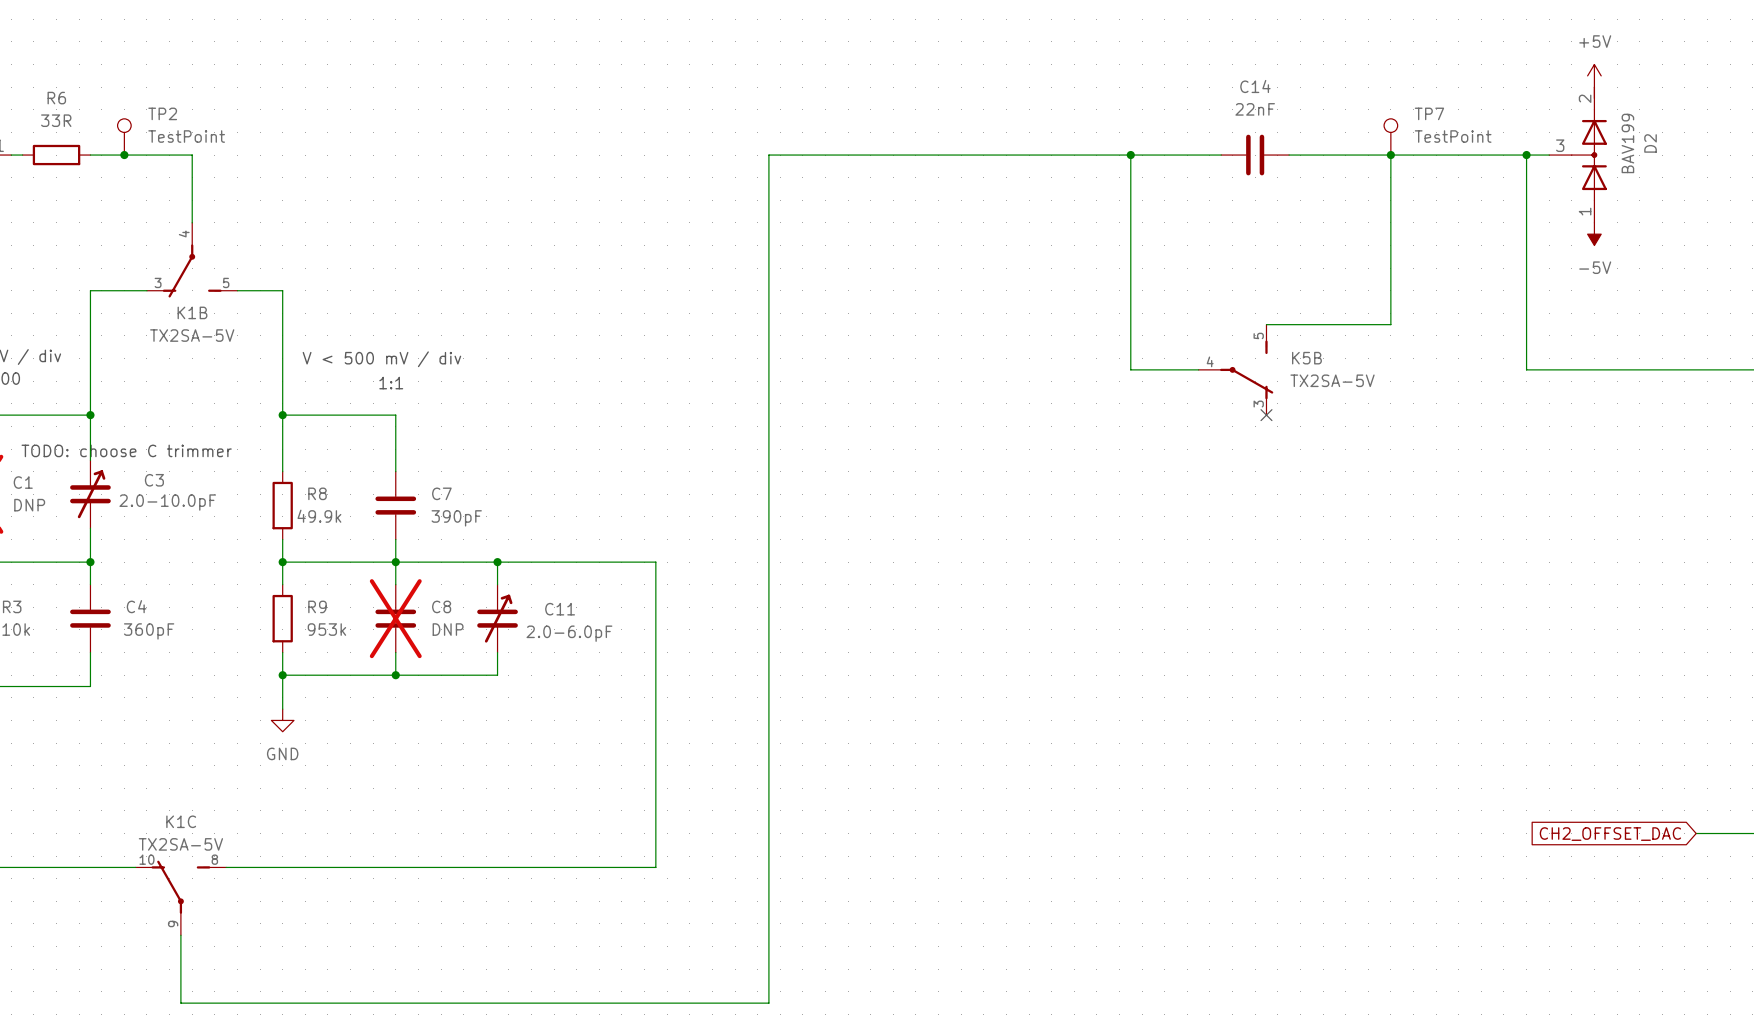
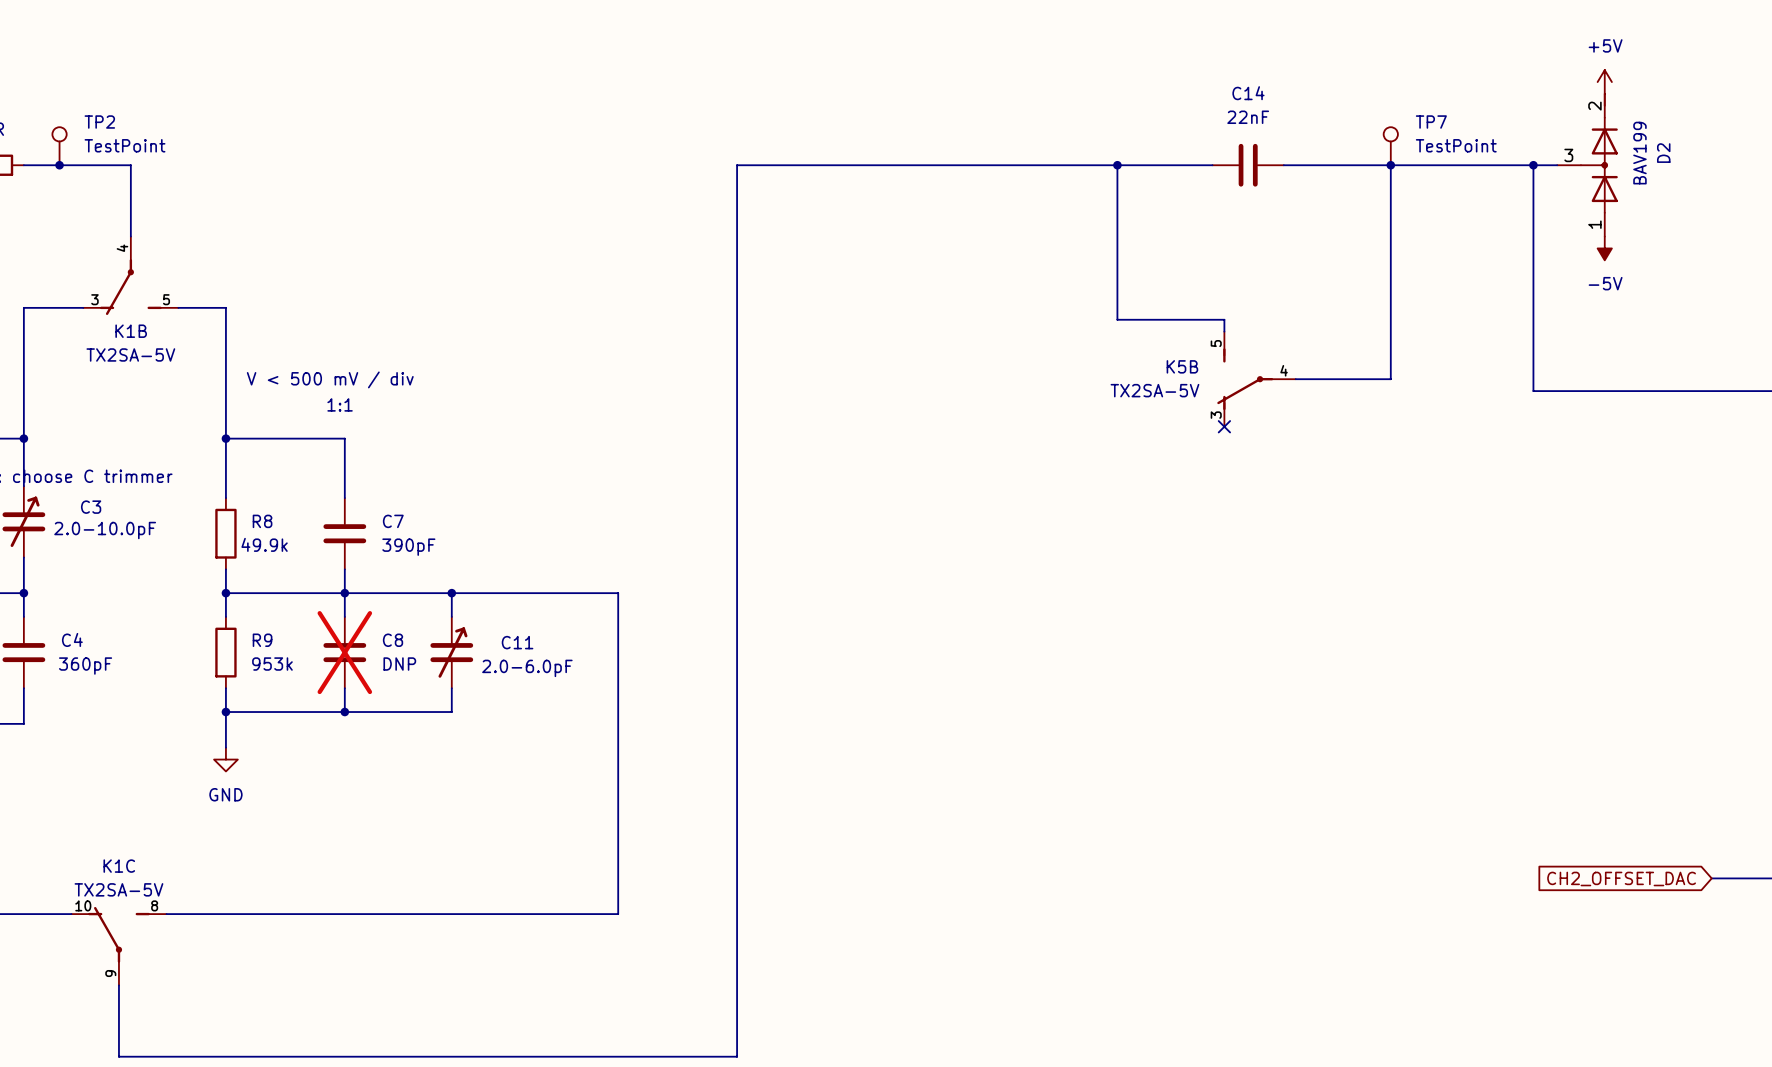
wire: (1130, 302) (1130, 369) (1198, 369) -> (1117, 319) (1224, 319) (1224, 331)
wire: (1266, 324) (1390, 324) -> (1295, 379) (1390, 379) (1390, 343)
K5B flip: as is (1246, 369) -> left-right (1245, 379)
no-connect mark position: (1266, 415) -> (1224, 426)

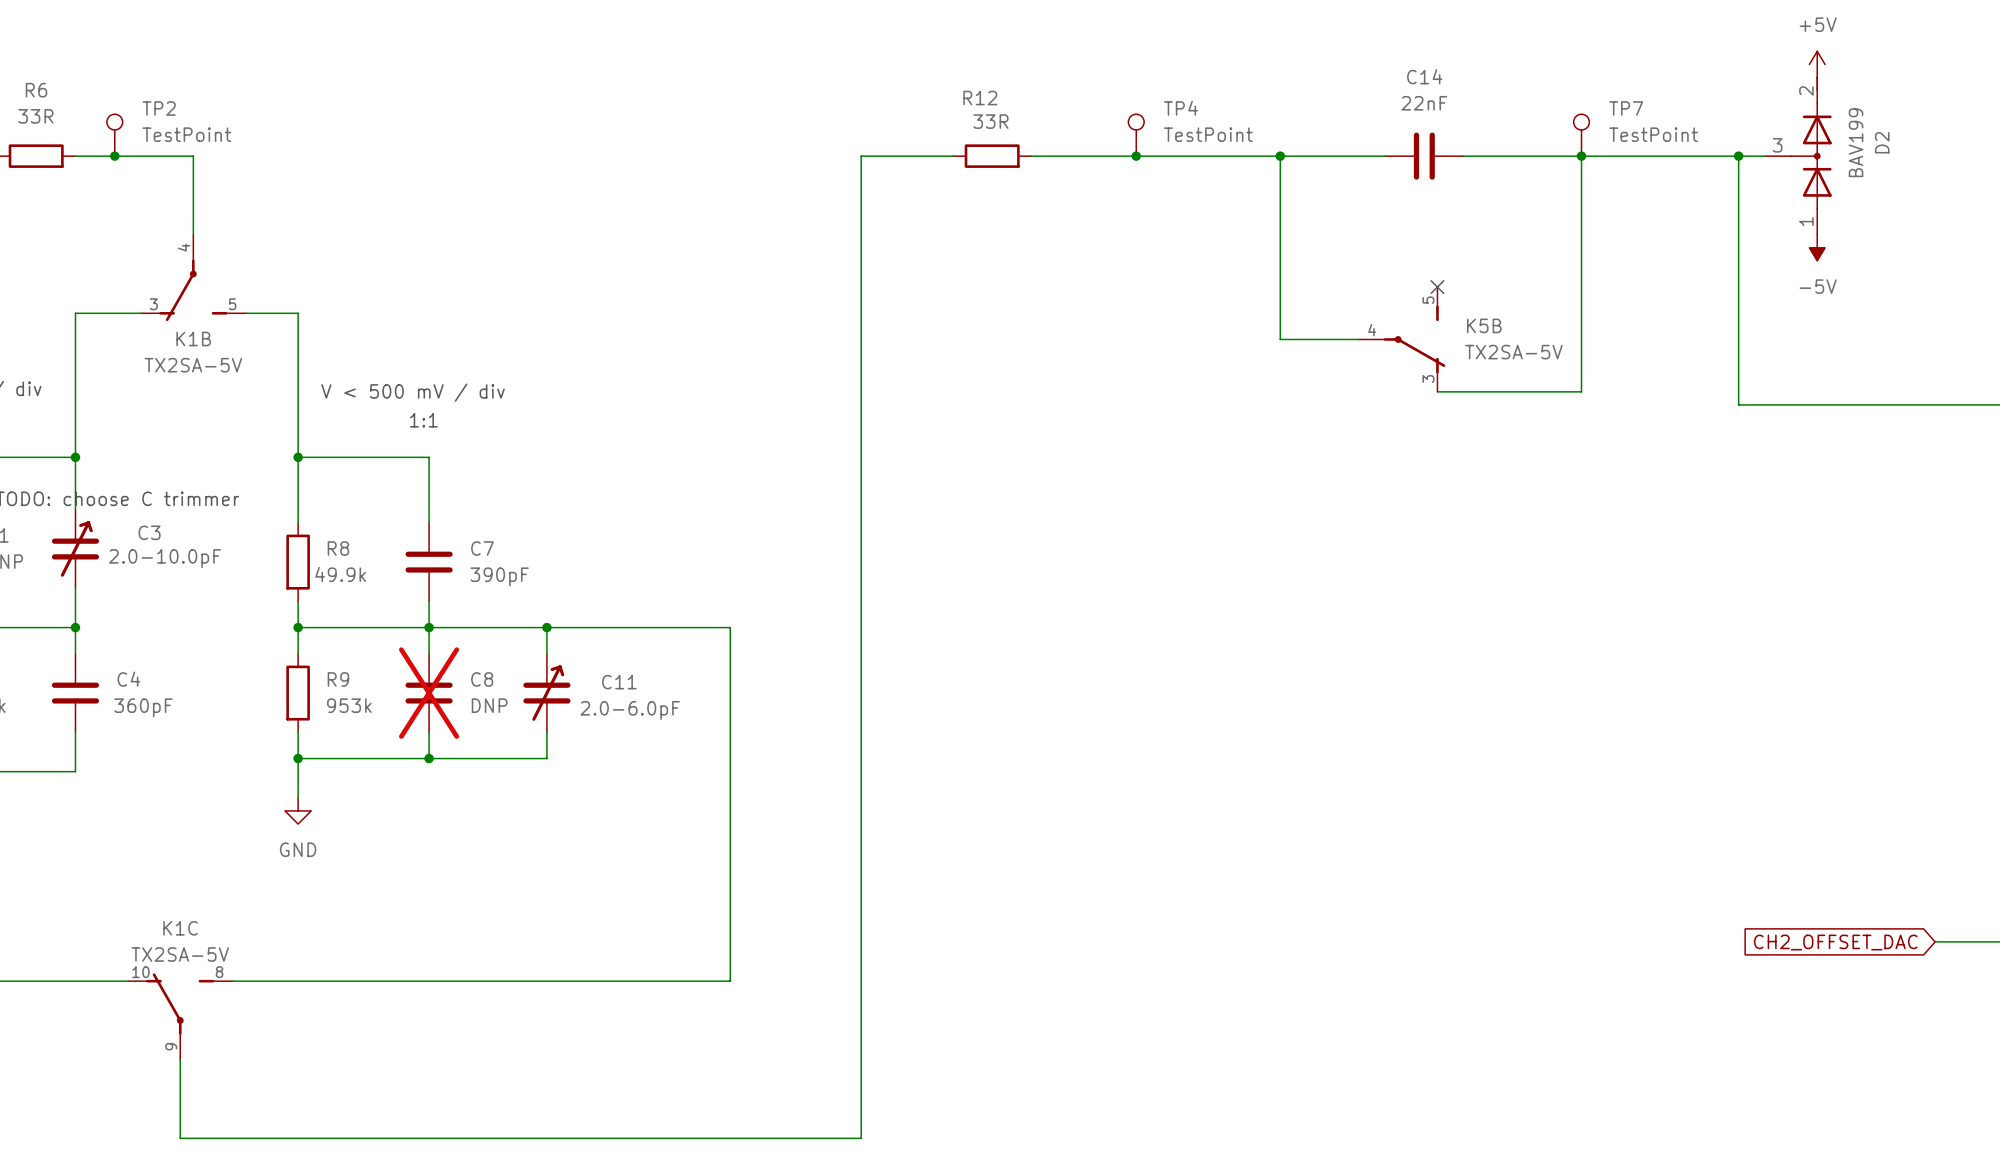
TP4: none -> TestPoint (1136, 135)
wire: (820, 165) (891, 165) -> none
R12: none -> 33R (992, 156)
junction: none -> (1136, 156)
no-connect mark: none -> (1437, 287)
wire: (1117, 319) (1224, 319) (1224, 331) -> (1280, 326) (1280, 339) (1358, 339)
K5B flip: as is (1245, 379) -> left-right (1414, 339)
no-connect mark: (1224, 426) -> none

